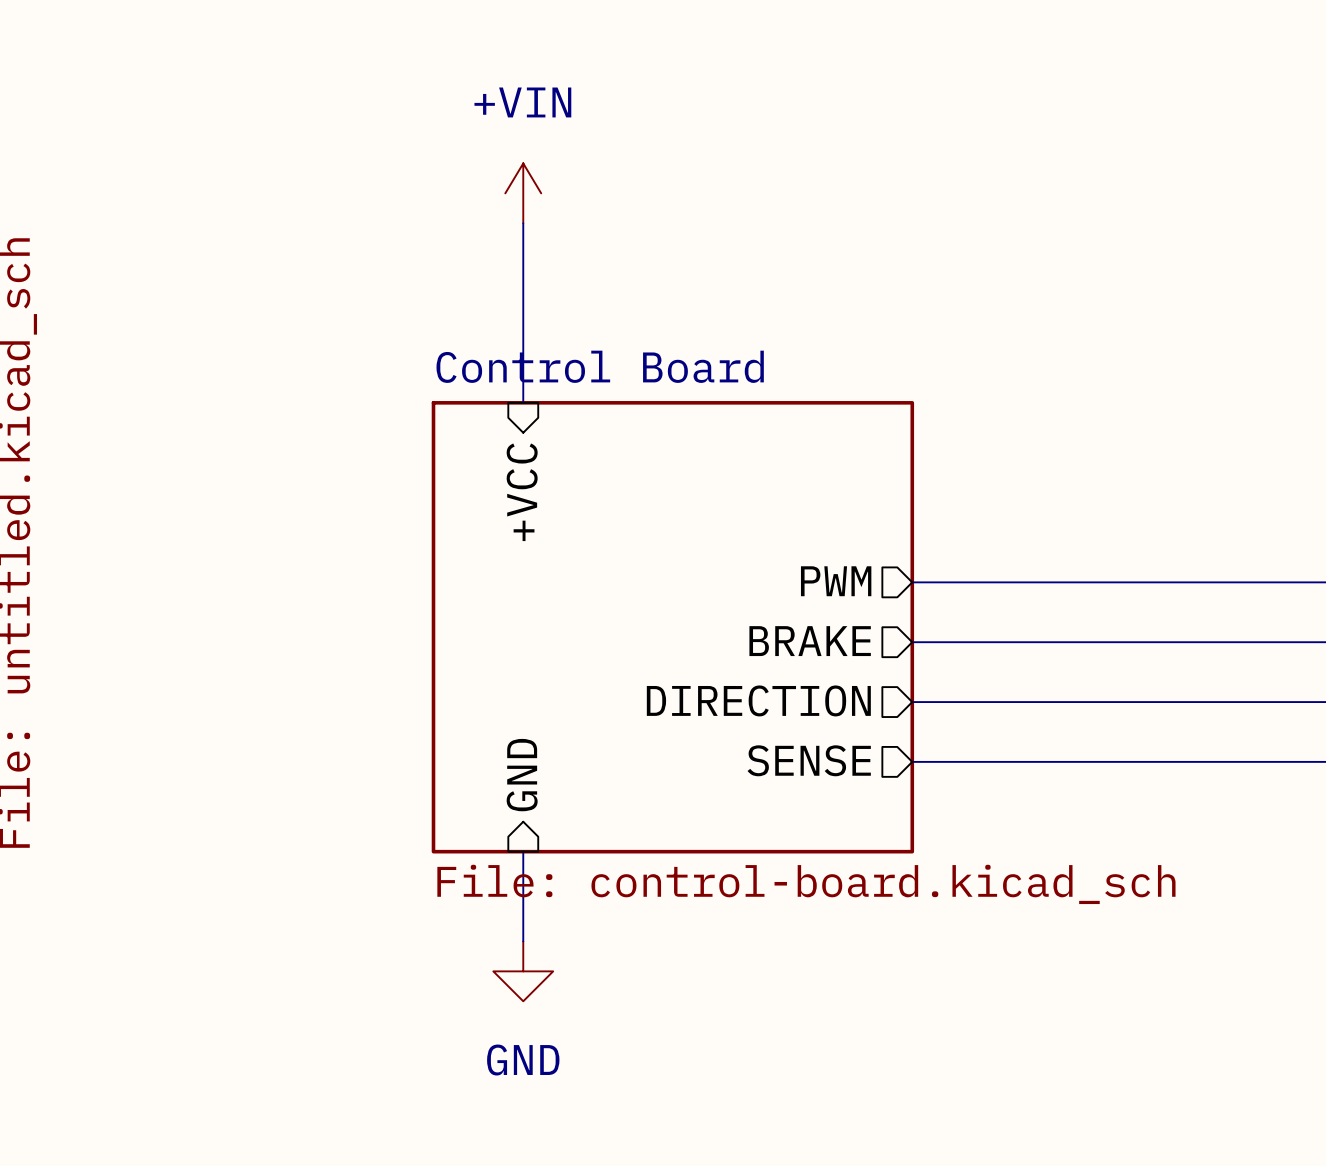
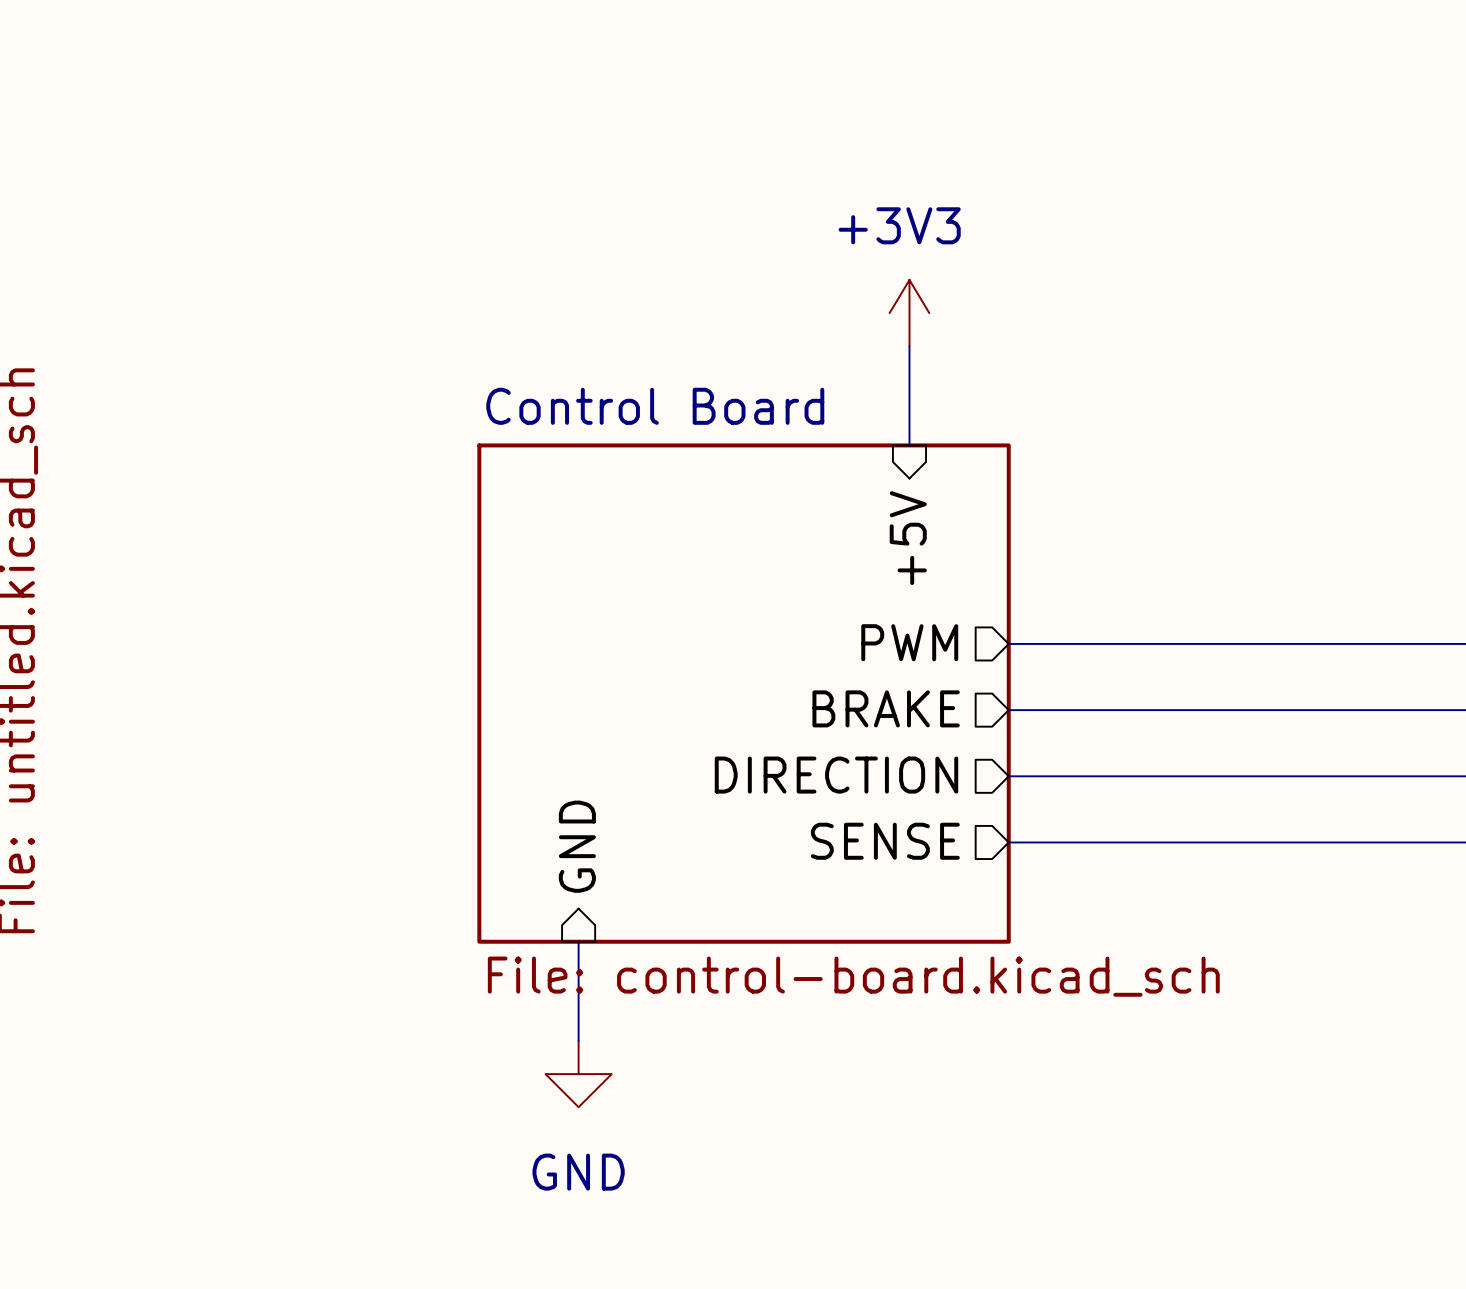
power symbol: +VIN (523, 193) -> none
wire: (523, 223) (523, 402) -> none
power symbol: none -> +3V3 (909, 313)
wire: none -> (909, 346) (909, 445)
sheet pin: none -> +5V (908, 538)
sheet pin: +VCC (522, 492) -> none

